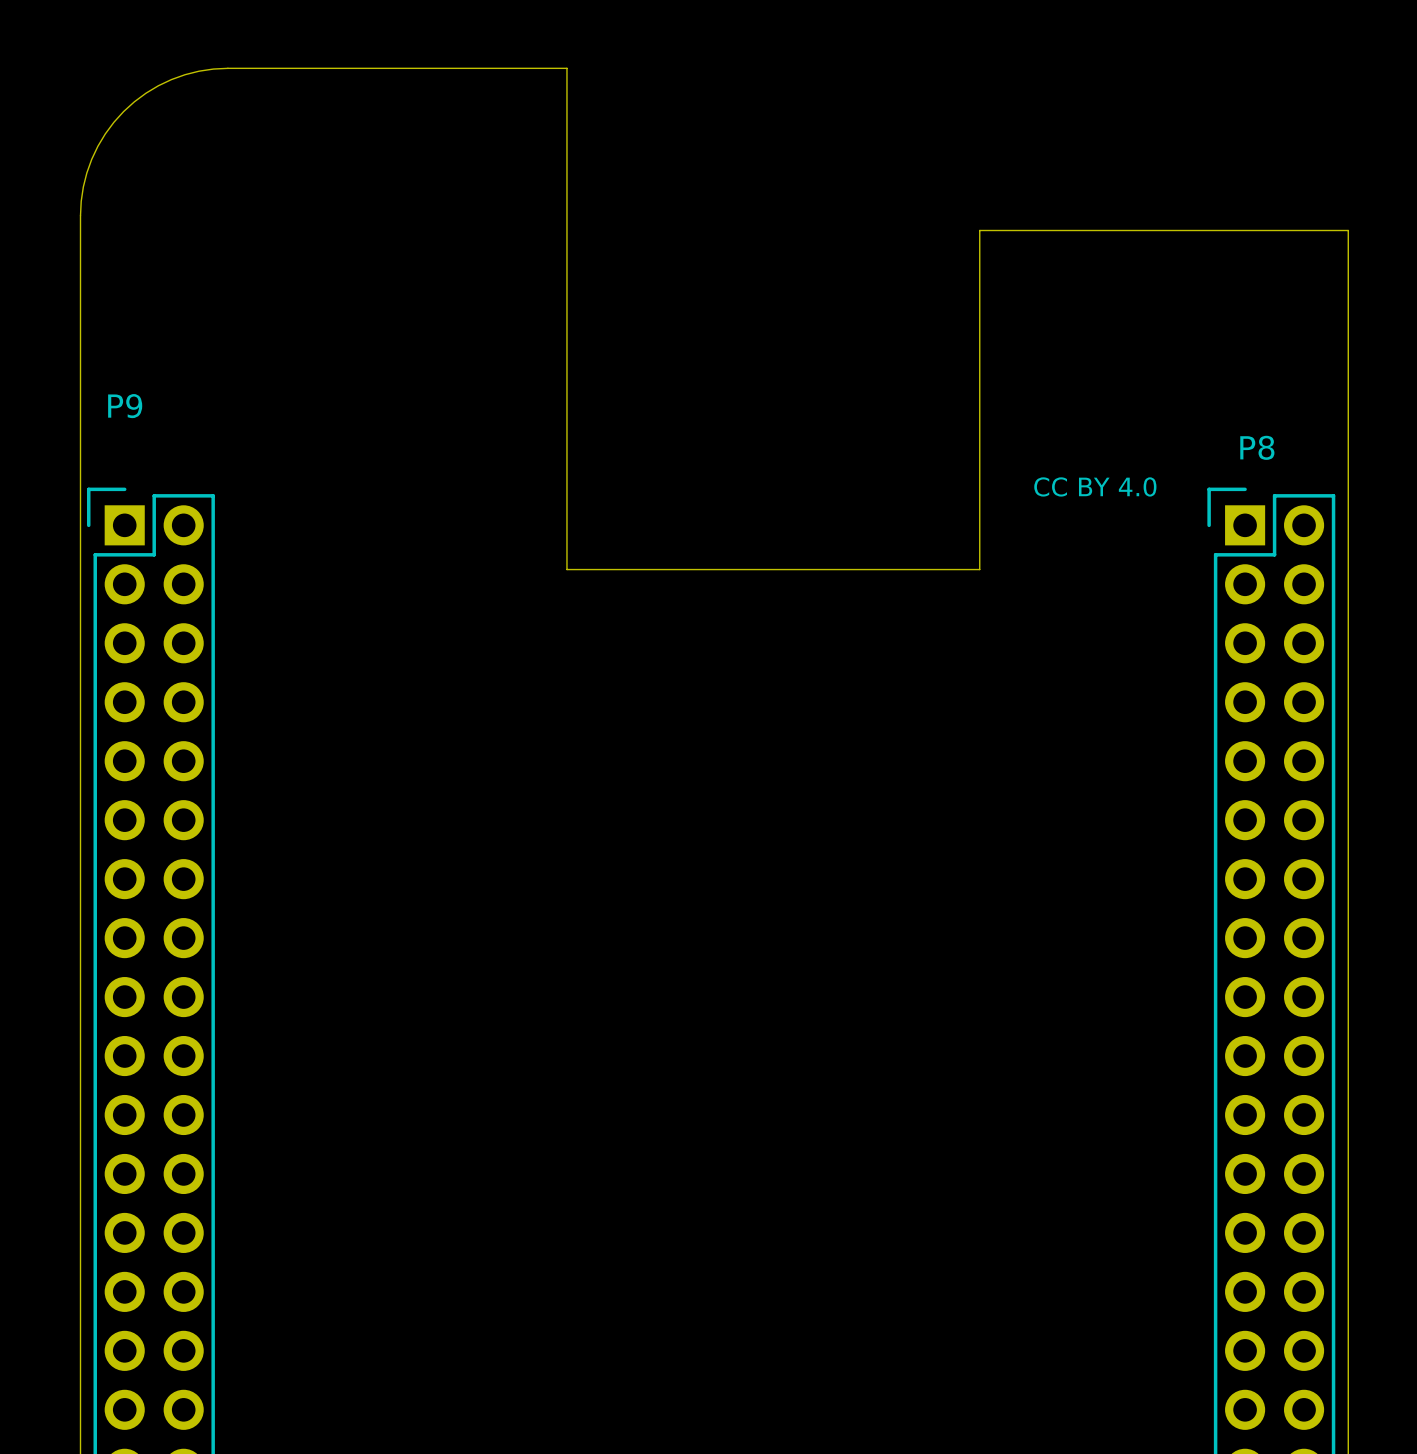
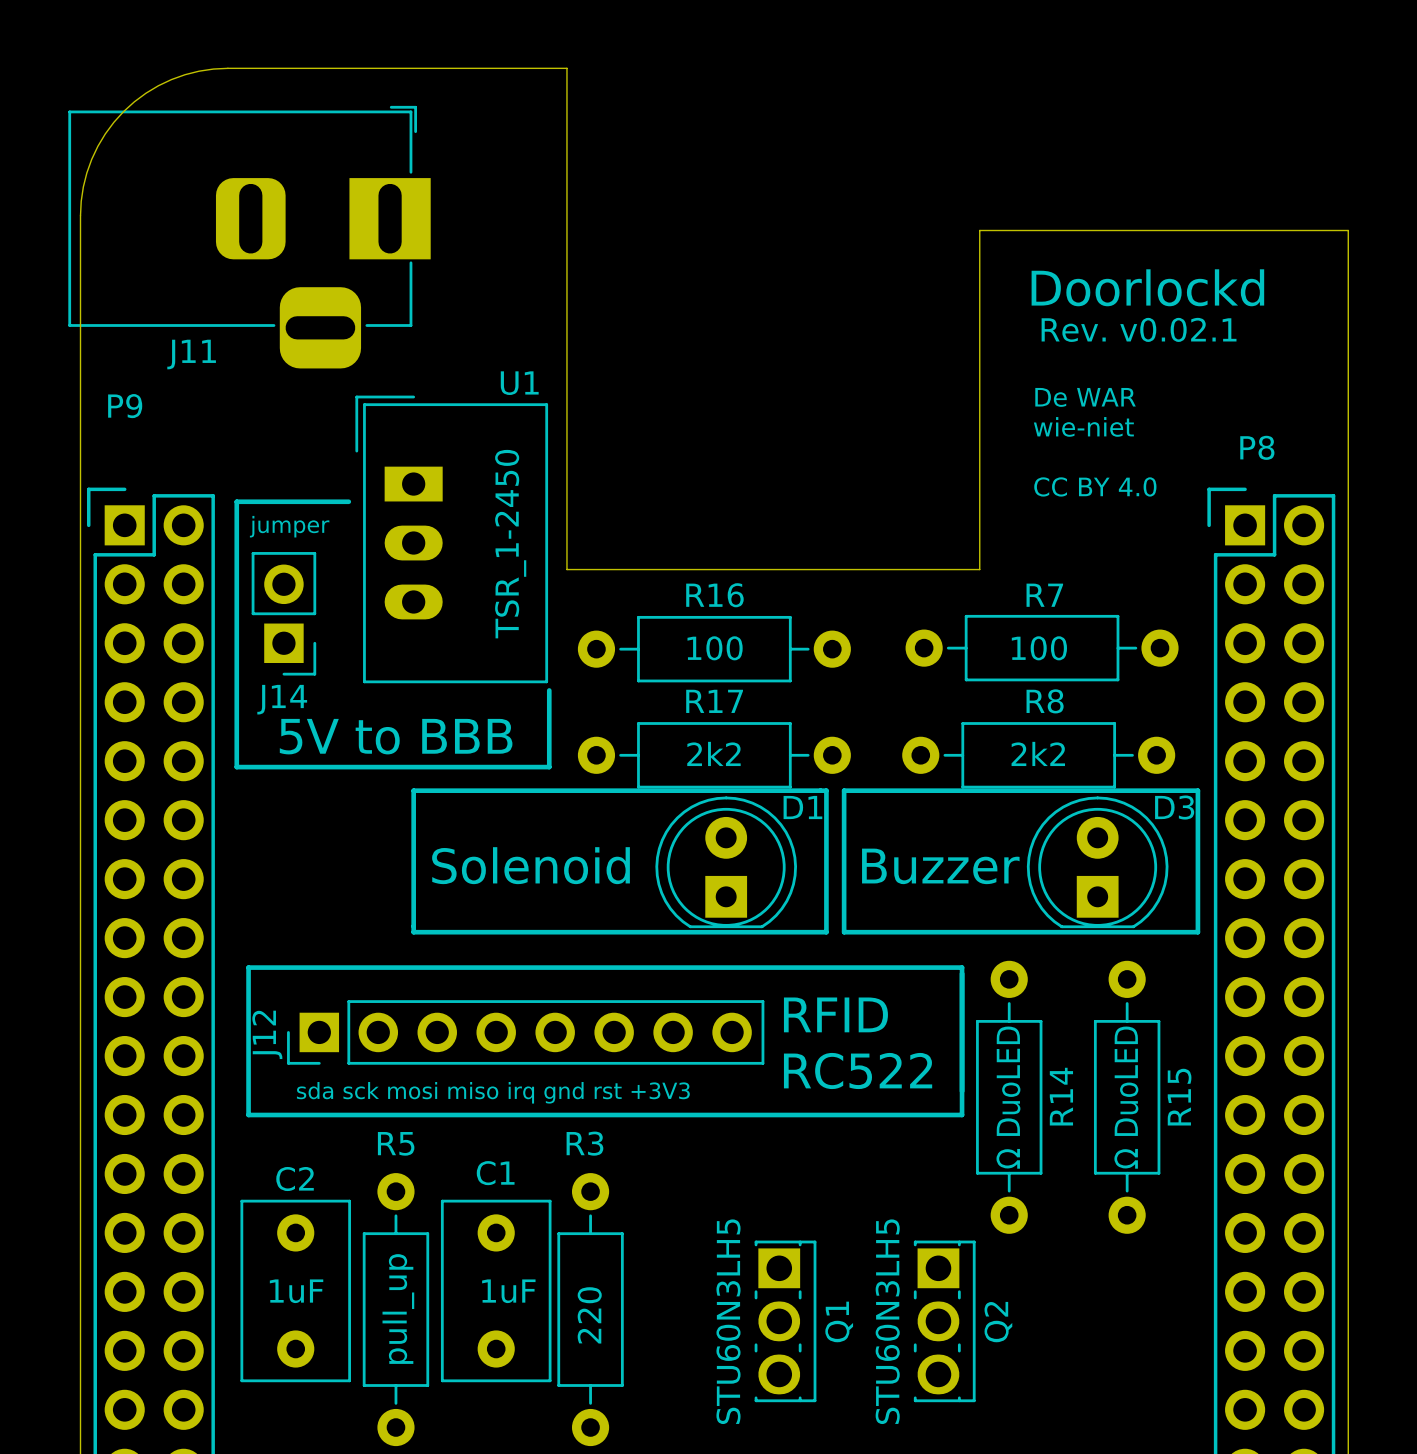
J11: none -> (249, 237)
text: none -> Doorlockd (1147, 287)
text: none -> Rev. v0.02.1 (1139, 329)
text: none -> De WAR (1085, 397)
text: none -> wie-niet (1083, 426)
line: none -> (348, 501) (236, 501) (236, 767) (549, 767) (549, 690)
text: none -> jumper (289, 526)
U1: none -> TSR_1-2450 (451, 539)
J14: none -> (283, 613)
R7: none -> 100 (1042, 648)
R16: none -> 100 (714, 649)
text: none -> 5V to BBB (396, 736)
R17: none -> 2k2 (714, 755)
R8: none -> 2k2 (1038, 755)
line: none -> (413, 790) (826, 790) (826, 932) (413, 932) (413, 790)
line: none -> (844, 790) (1197, 790) (1197, 932) (844, 932) (844, 790)
D1: none -> (726, 862)
D3: none -> (1097, 862)
text: none -> Solenoid (531, 865)
text: none -> Buzzer (940, 866)
line: none -> (248, 967) (962, 967) (962, 1115) (248, 1115) (248, 967)
text: none -> RFID (835, 1014)
J12: none -> (525, 1032)
text: none -> RC522 (858, 1070)
text: none -> sda sck mosi miso irq gnd rst +3V3 (493, 1092)
R14: none -> Ω DuoLED (1009, 1097)
R15: none -> Ω DuoLED (1127, 1097)
C2: none -> 1uF (295, 1290)
C1: none -> 1uF (496, 1290)
R5: none -> pull_up (395, 1309)
R3: none -> 220 (590, 1309)
Q1: none -> STU60N3LH5 (785, 1321)
Q2: none -> STU60N3LH5 (944, 1321)

